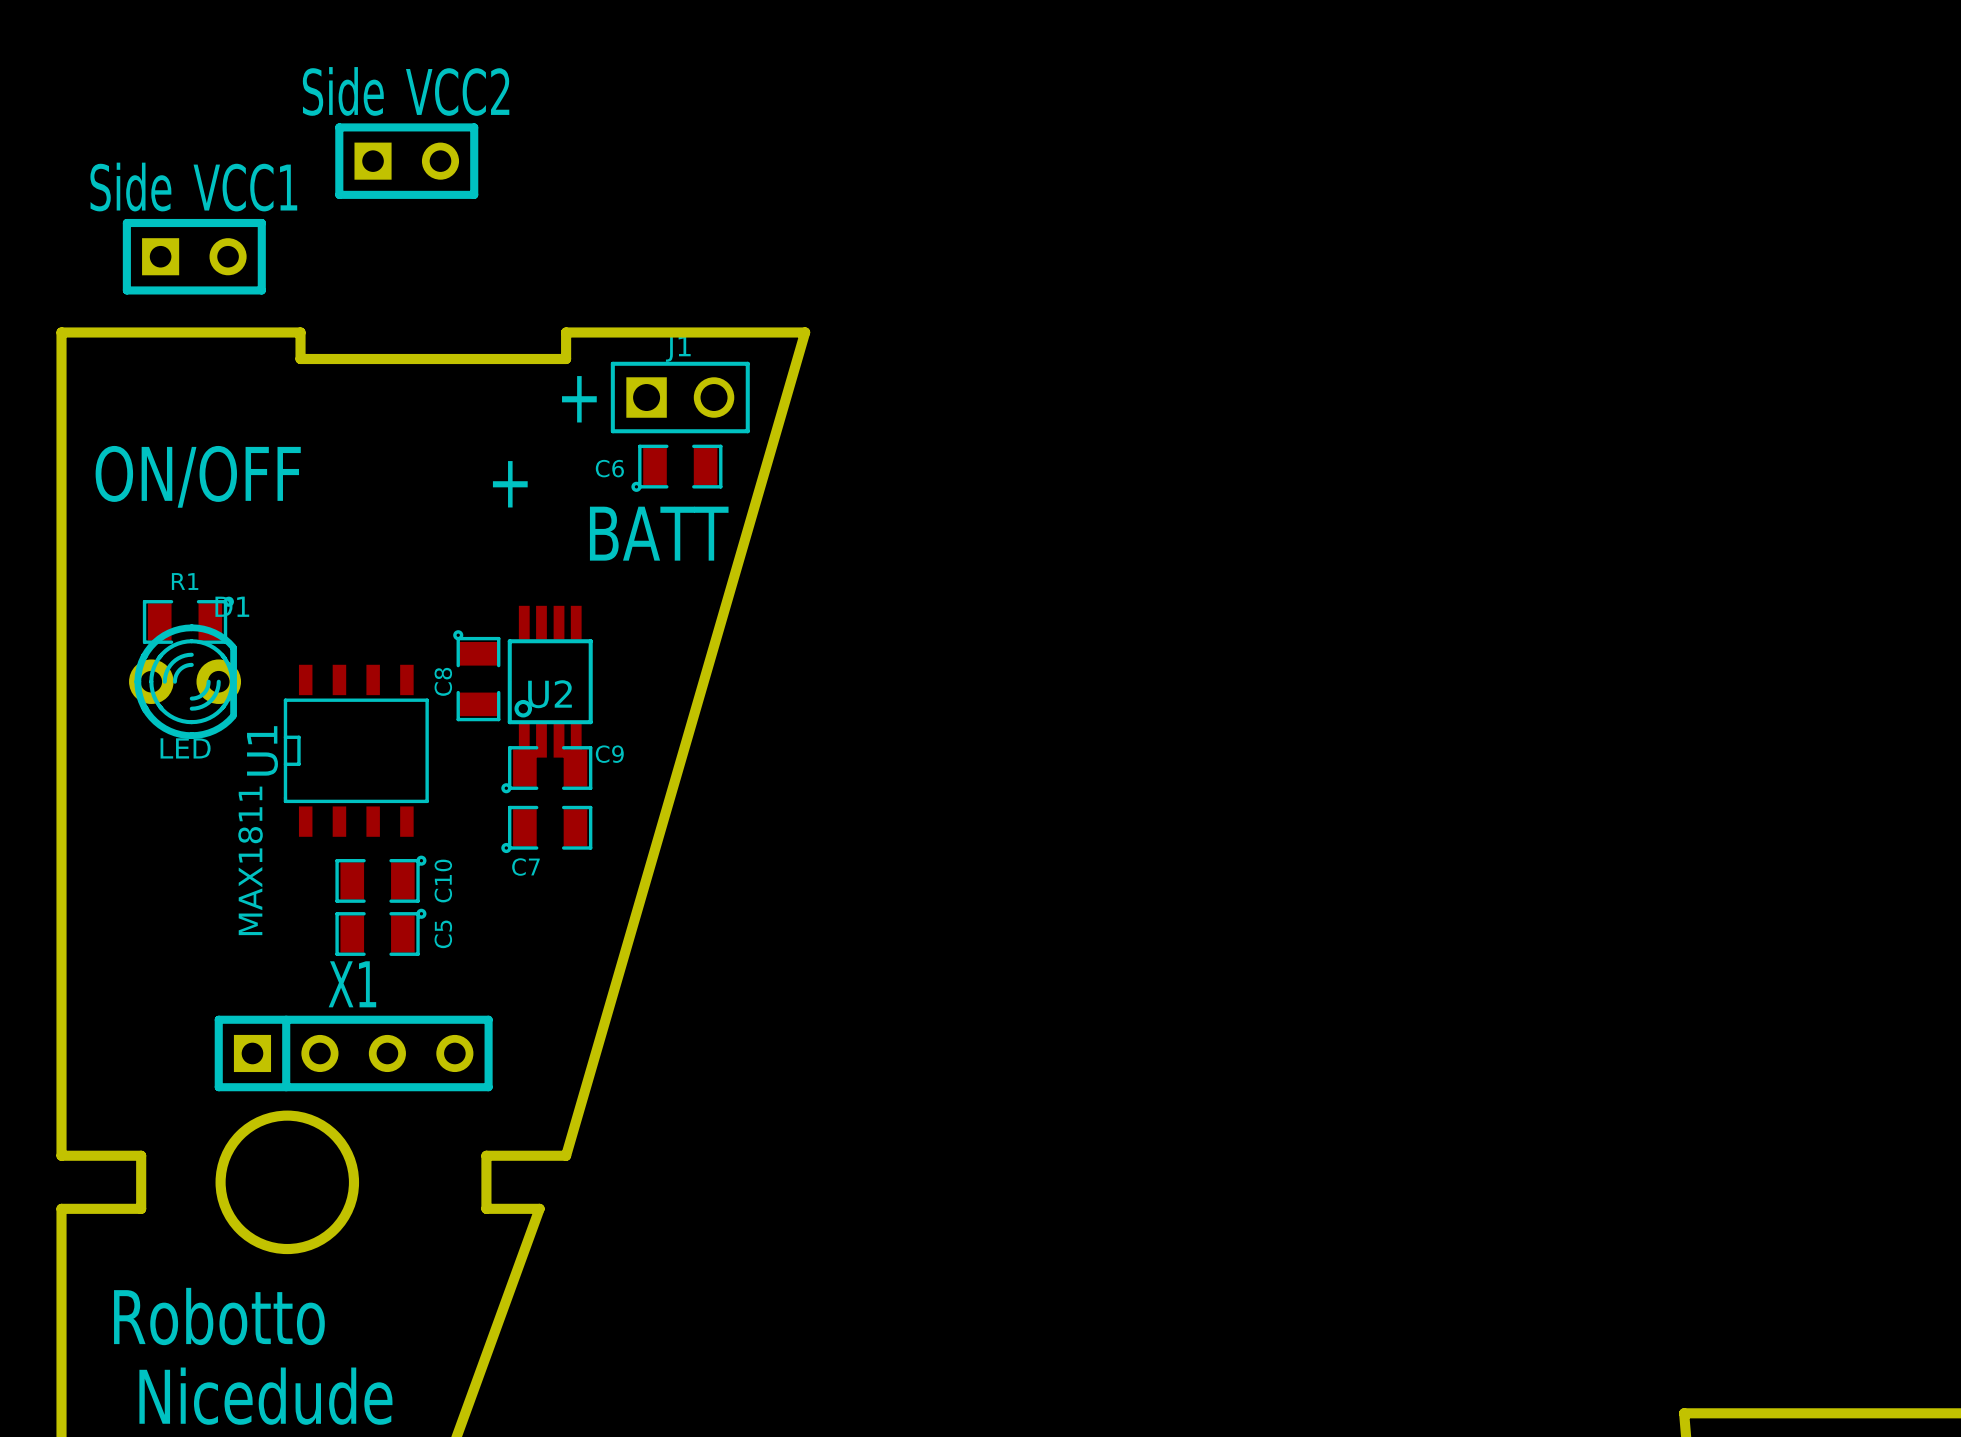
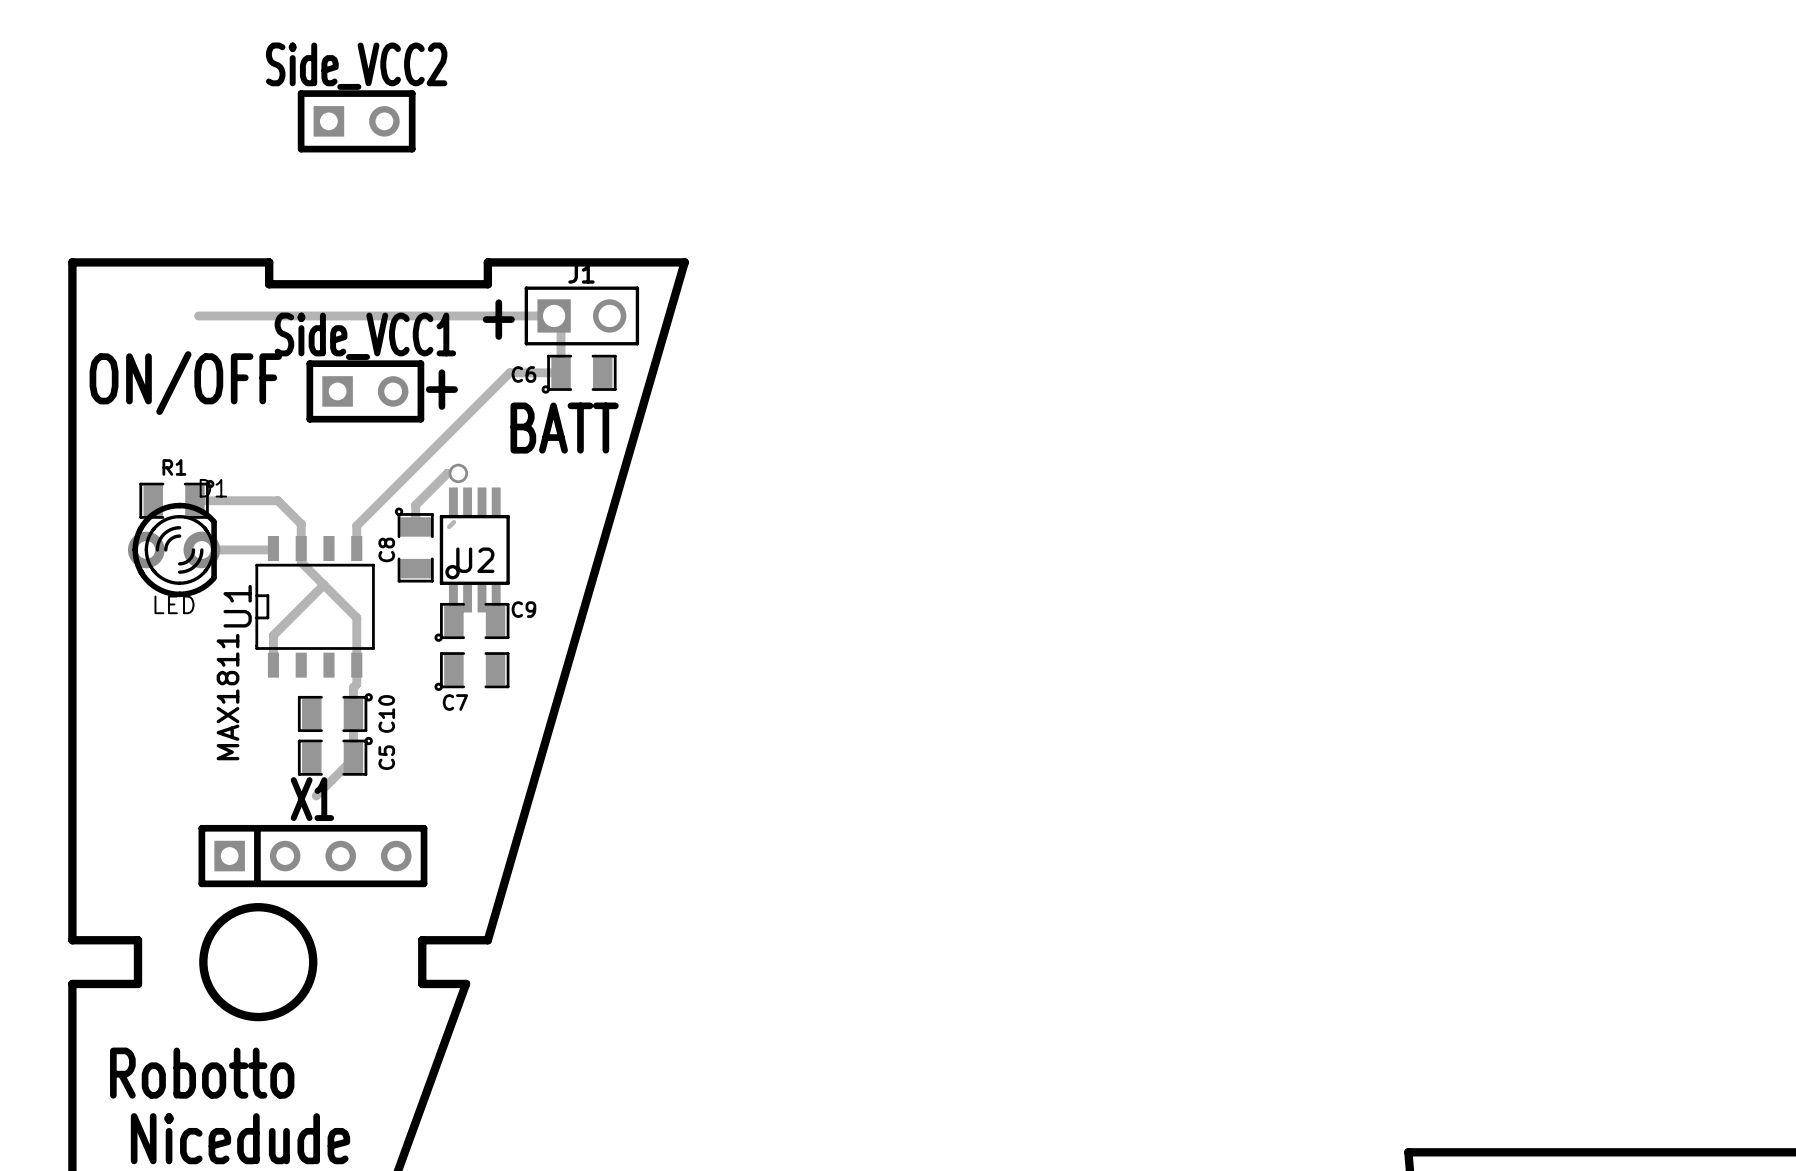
Side_VCC1 position: (194, 256) -> (365, 391)
track: none -> (198, 315) (554, 315) (561, 322) (561, 372) (509, 372) (356, 525) (356, 548)
track: none -> (458, 473) (447, 473) (415, 505) (415, 526)
via: none -> (458, 473)
track: none -> (194, 500) (277, 500) (301, 524) (301, 562) (356, 617) (356, 684) (353, 687) (353, 758) (316, 795)
track: none -> (453, 522) (449, 526)
track: none -> (197, 549) (272, 549)
track: none -> (323, 584) (273, 635) (273, 665)

